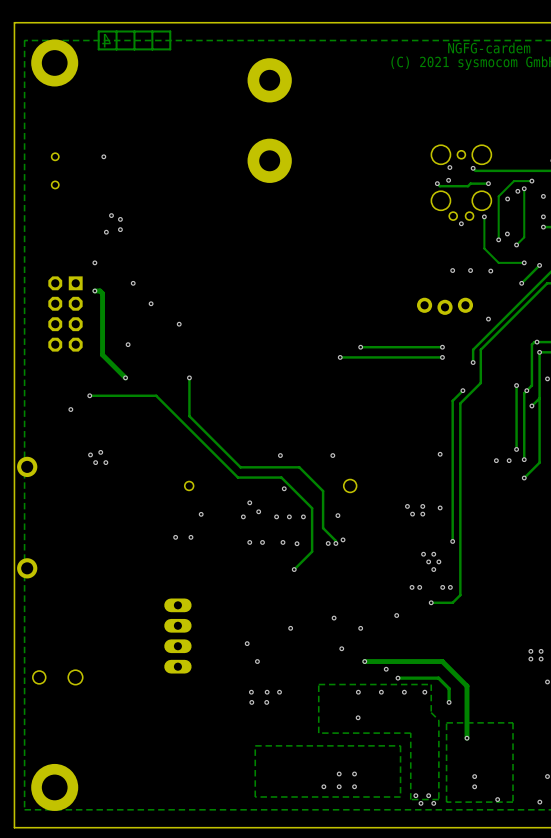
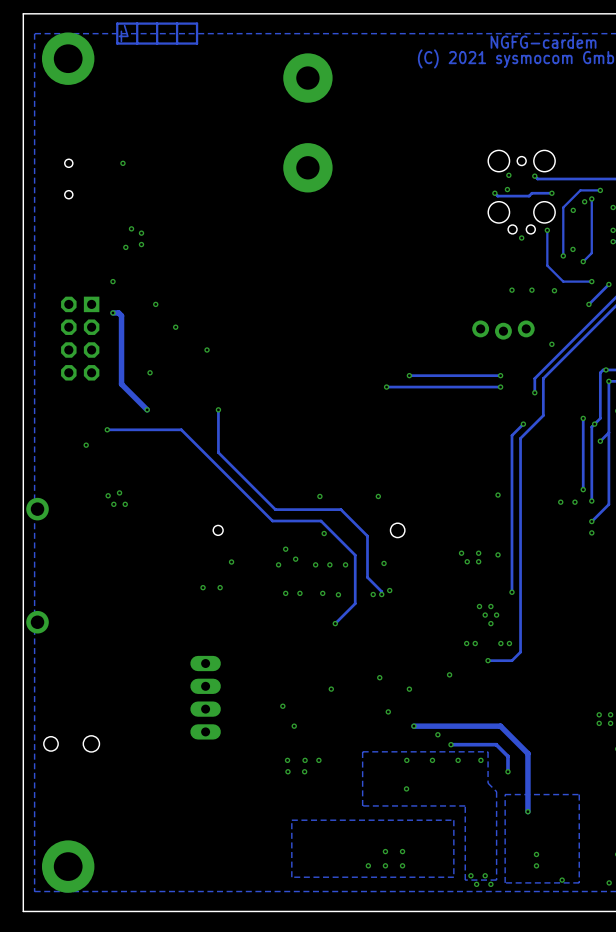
via: none -> (591, 532)

